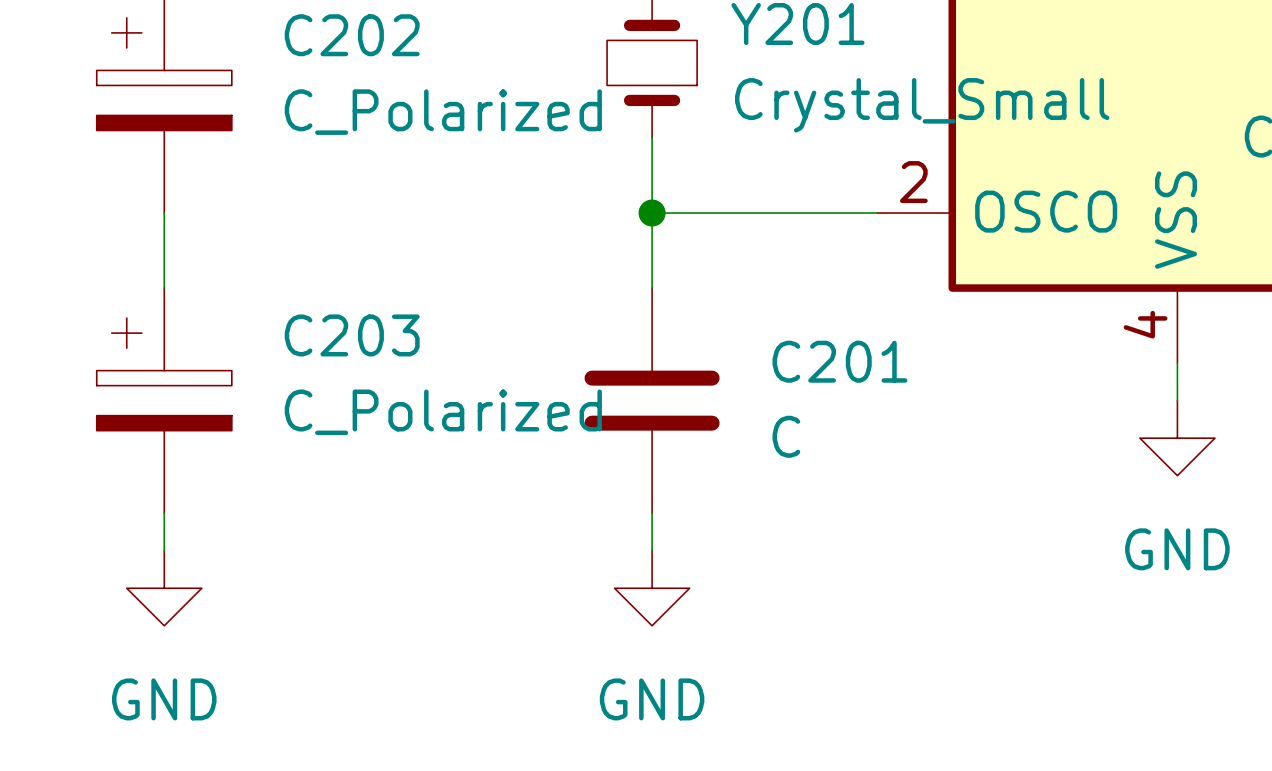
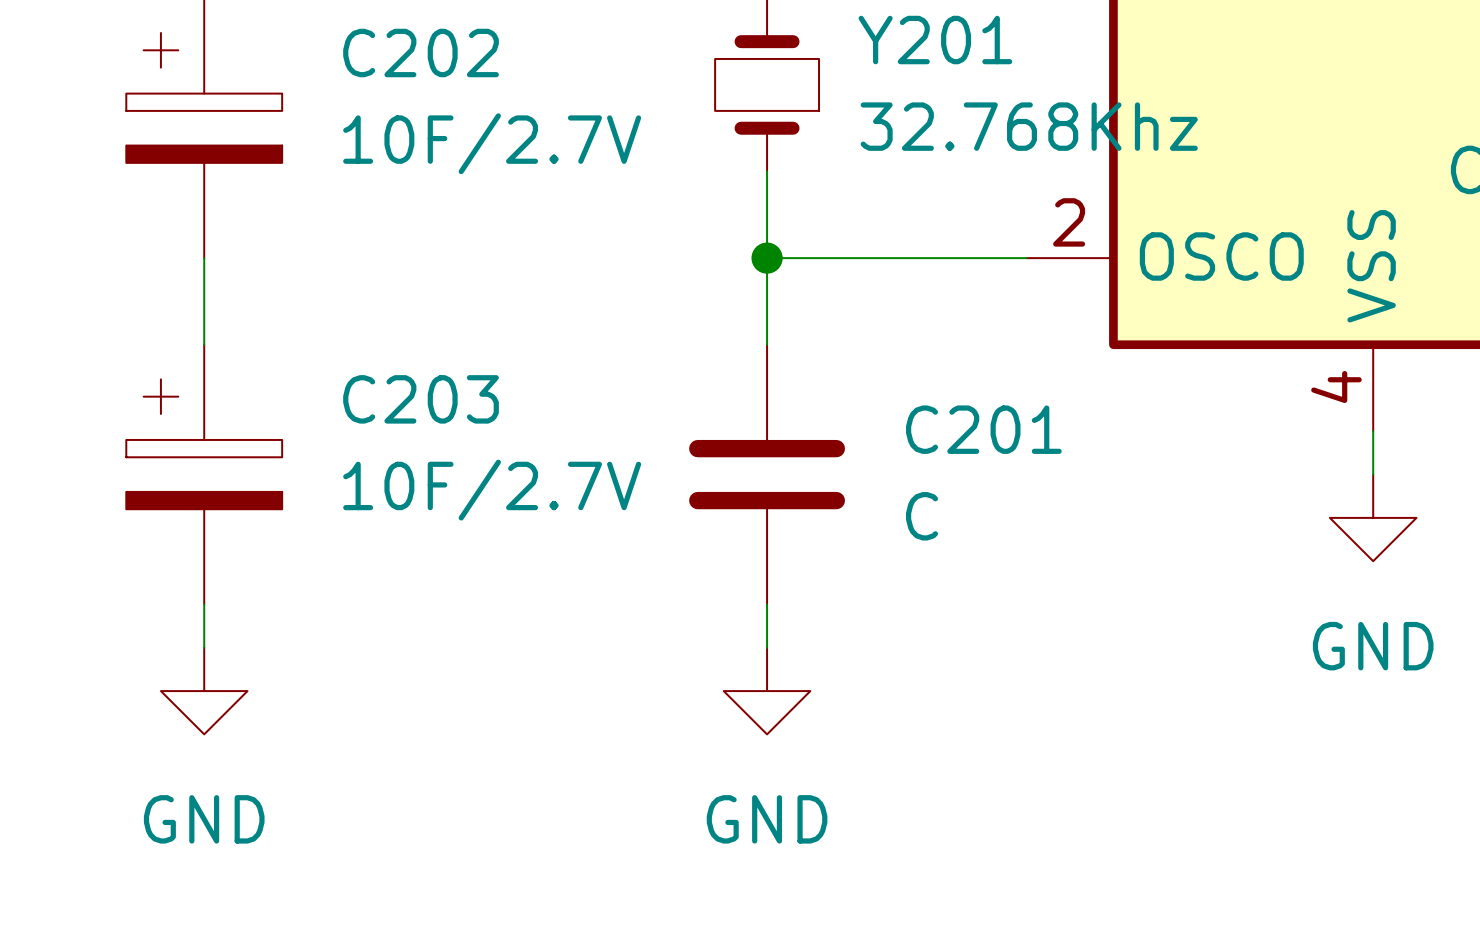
Y201 value: Crystal_Small (922, 105) -> 32.768Khz (1029, 126)
C202 value: C_Polarized (443, 112) -> 10F/2.7V (492, 143)
C203 value: C_Polarized (443, 412) -> 10F/2.7V (492, 490)

